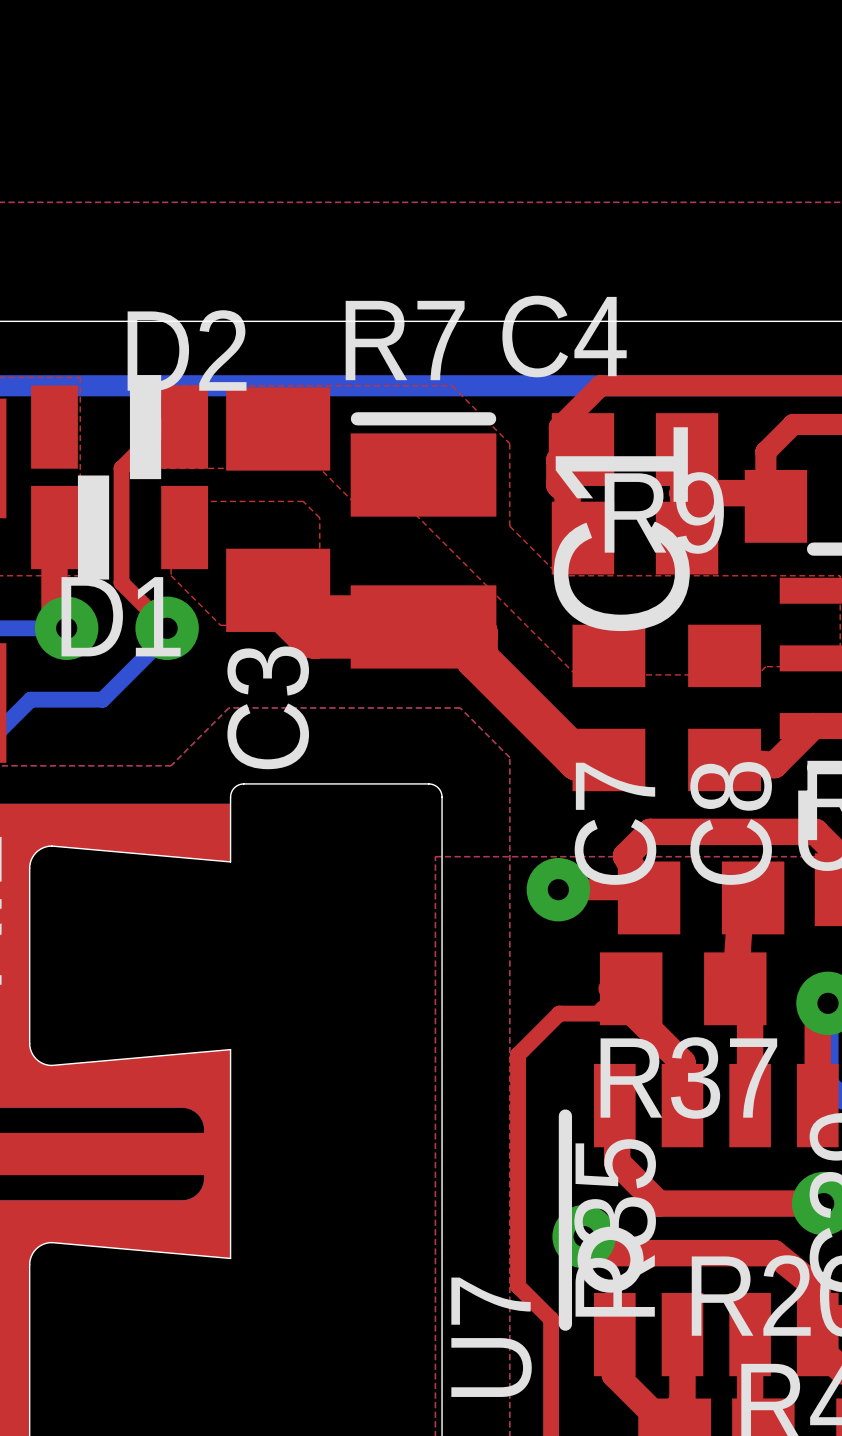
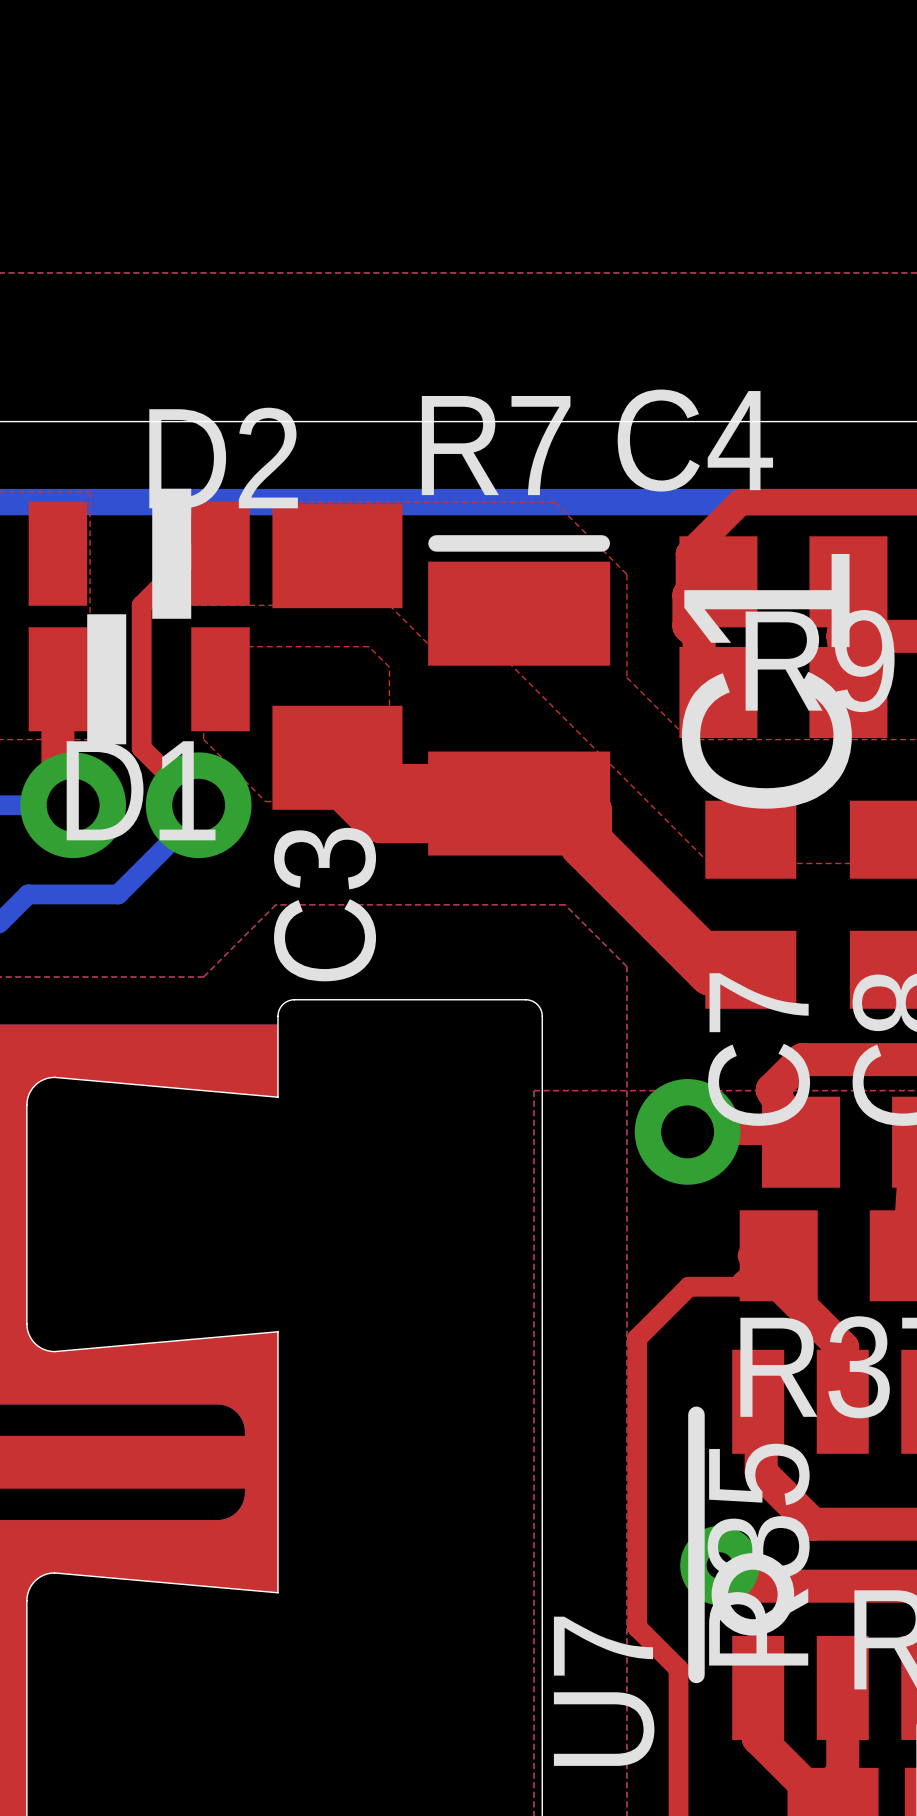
via size: [34, 596, 99, 661] -> [20, 752, 127, 859]
via size: [135, 596, 199, 661] -> [145, 752, 252, 859]
via size: [526, 857, 591, 922] -> [634, 1079, 741, 1185]

